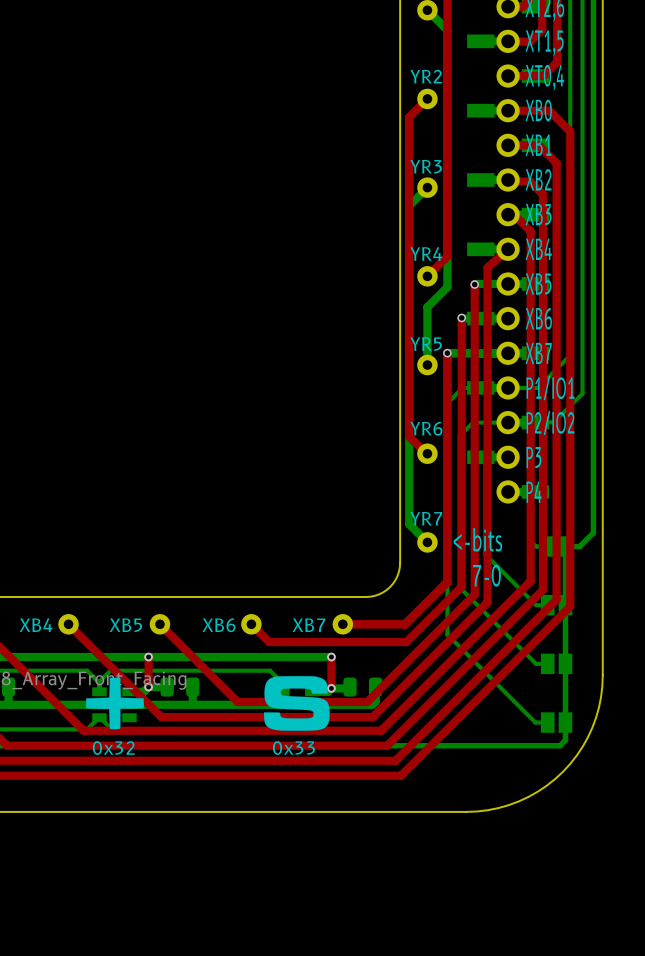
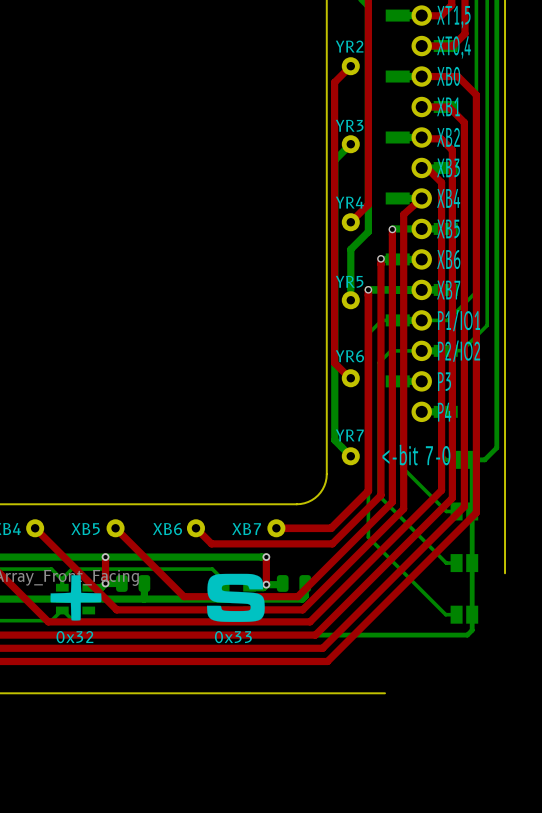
text: <-bits (477, 539) -> <-bit 7-0 (416, 455)
text: 7-0 (486, 575) -> none
board edge: (602, 675) (601, 696) (592, 727) (576, 755) (562, 771) (546, 785) (518, 801) (487, 810) (466, 811) -> none

